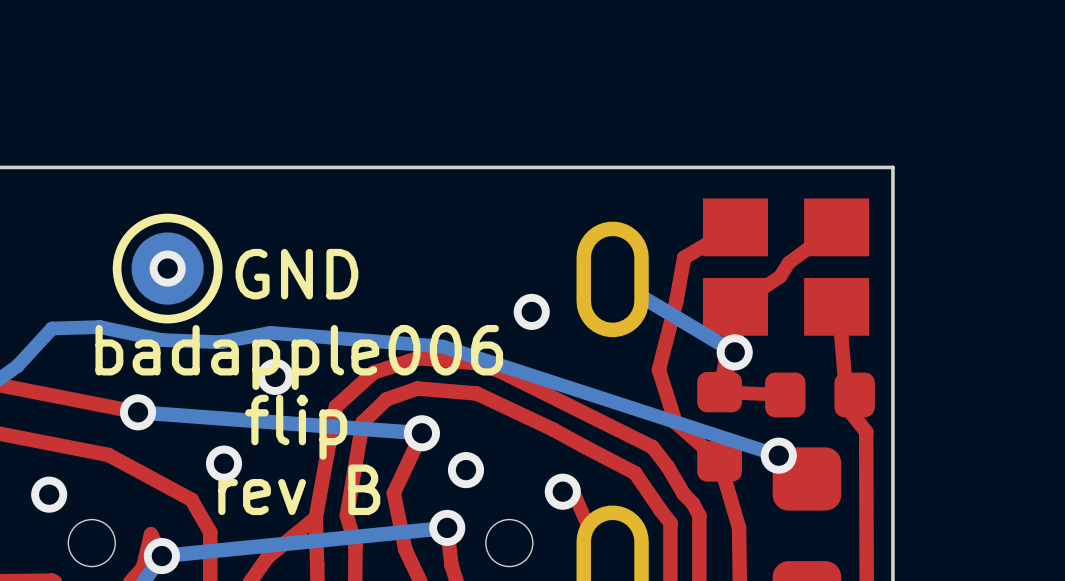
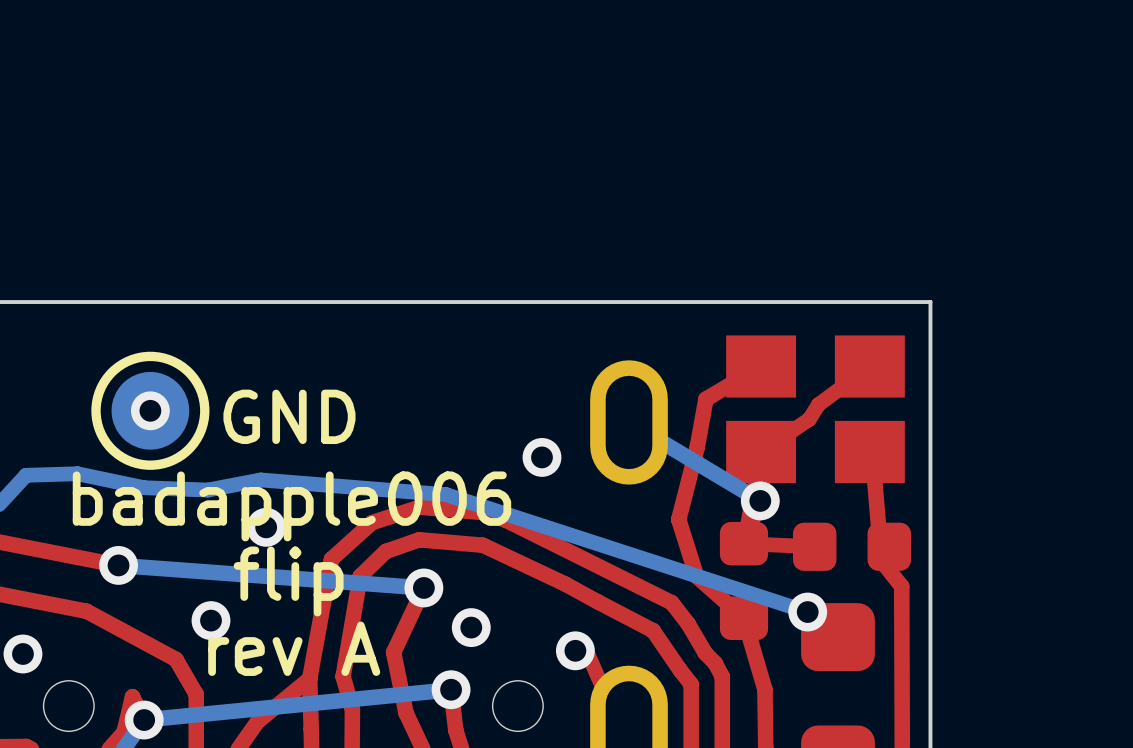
text: rev B (299, 489) -> rev A (294, 648)

